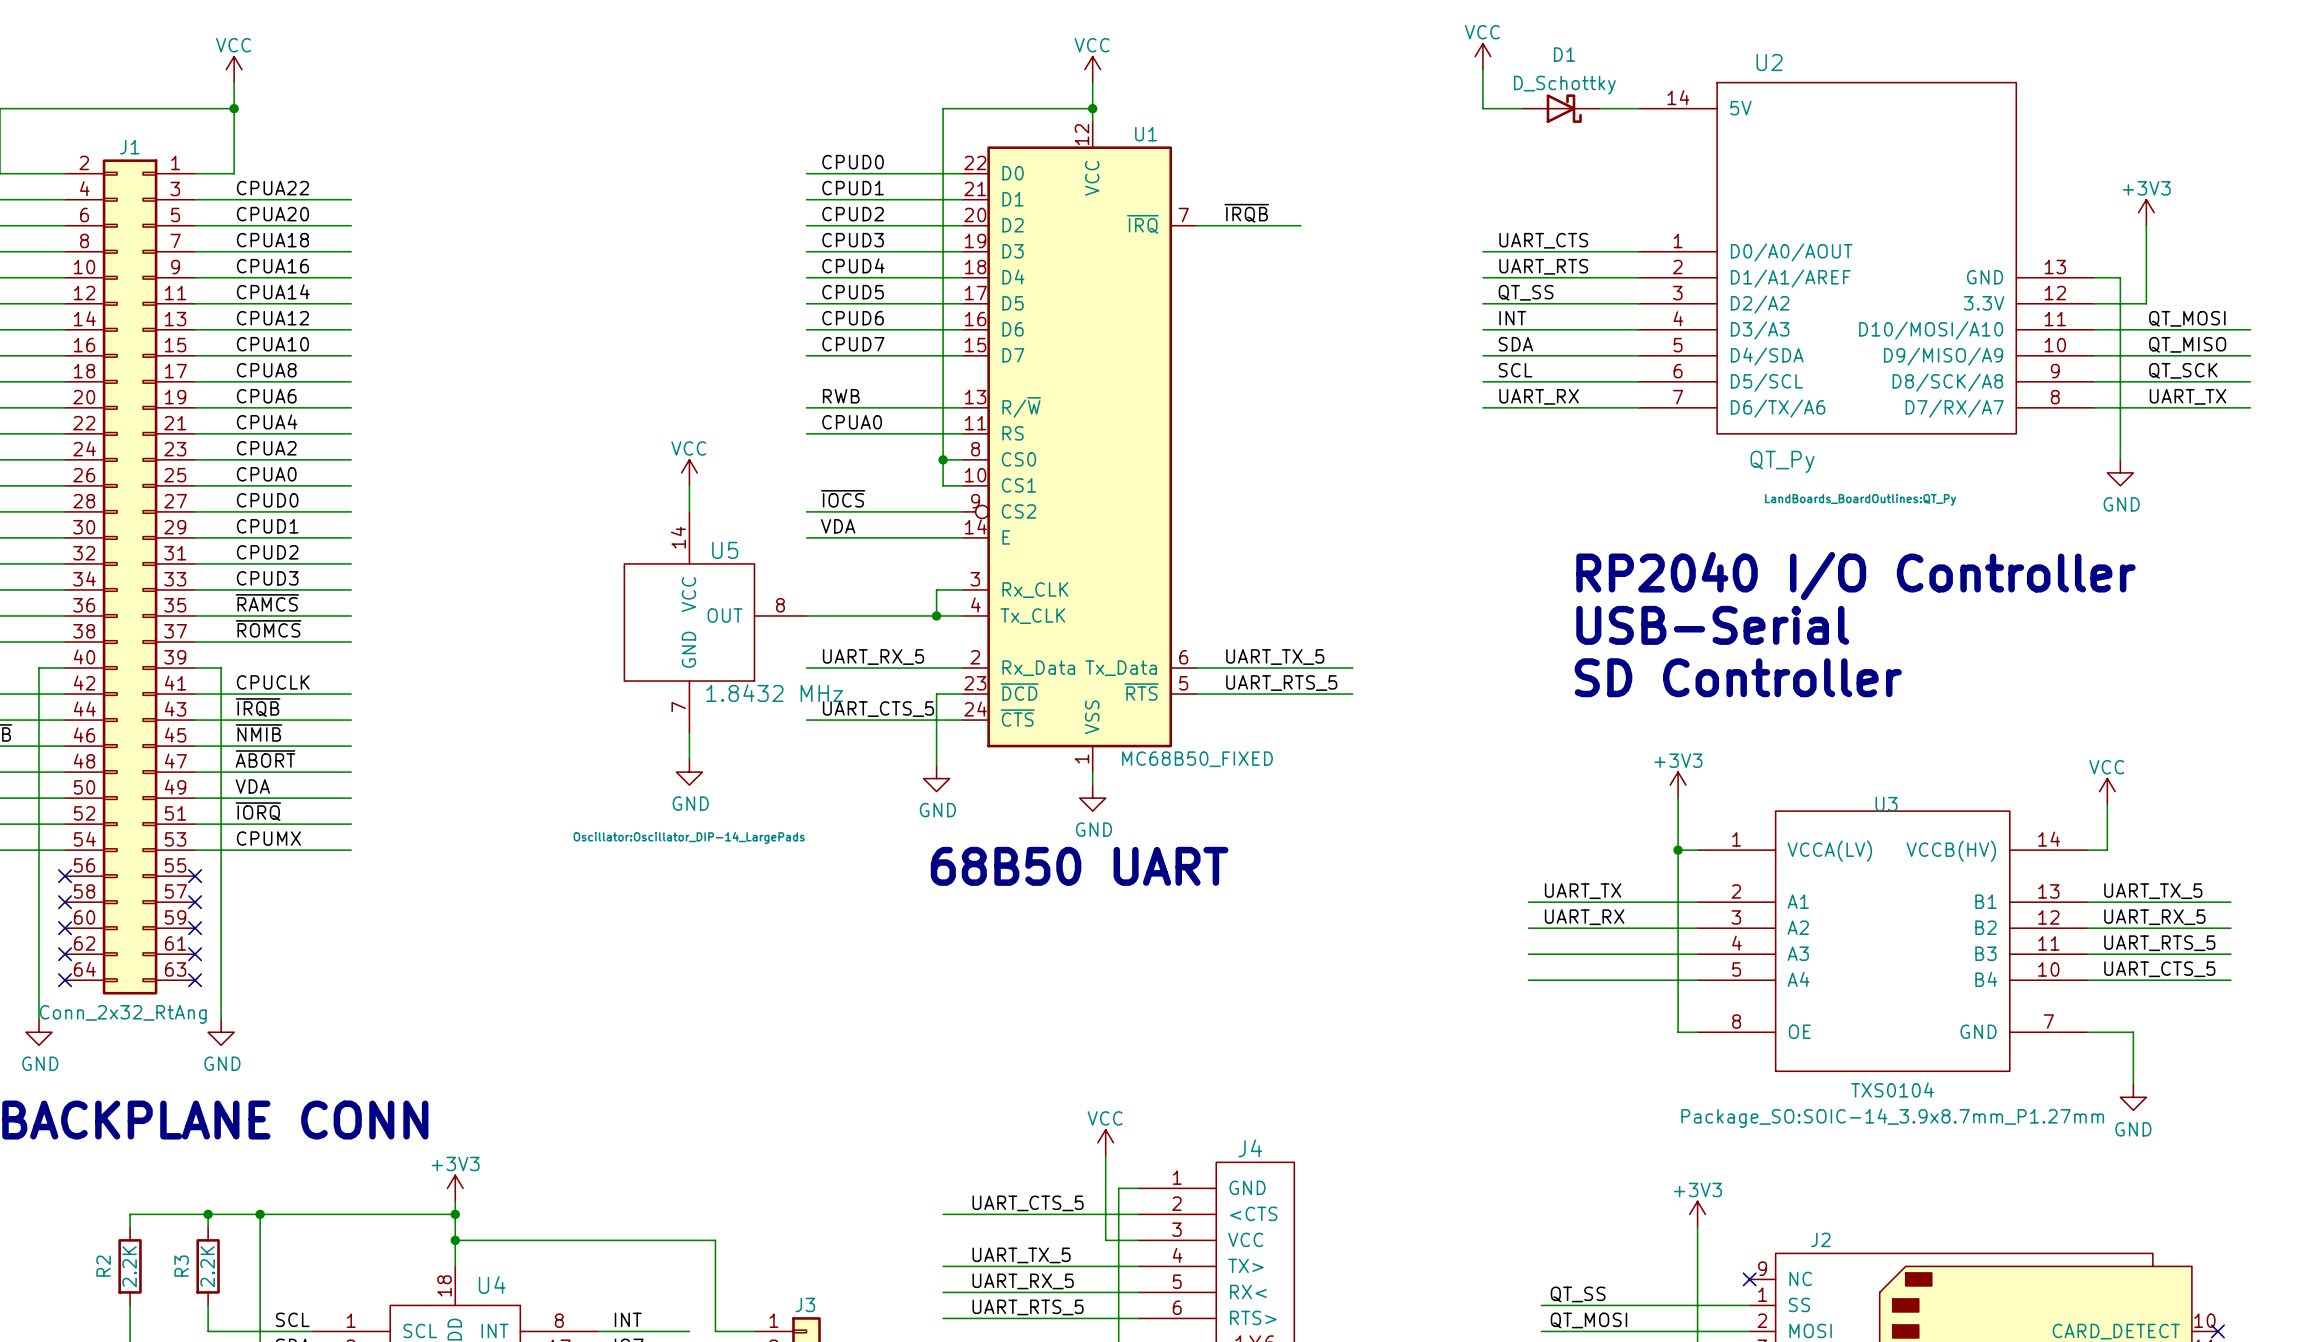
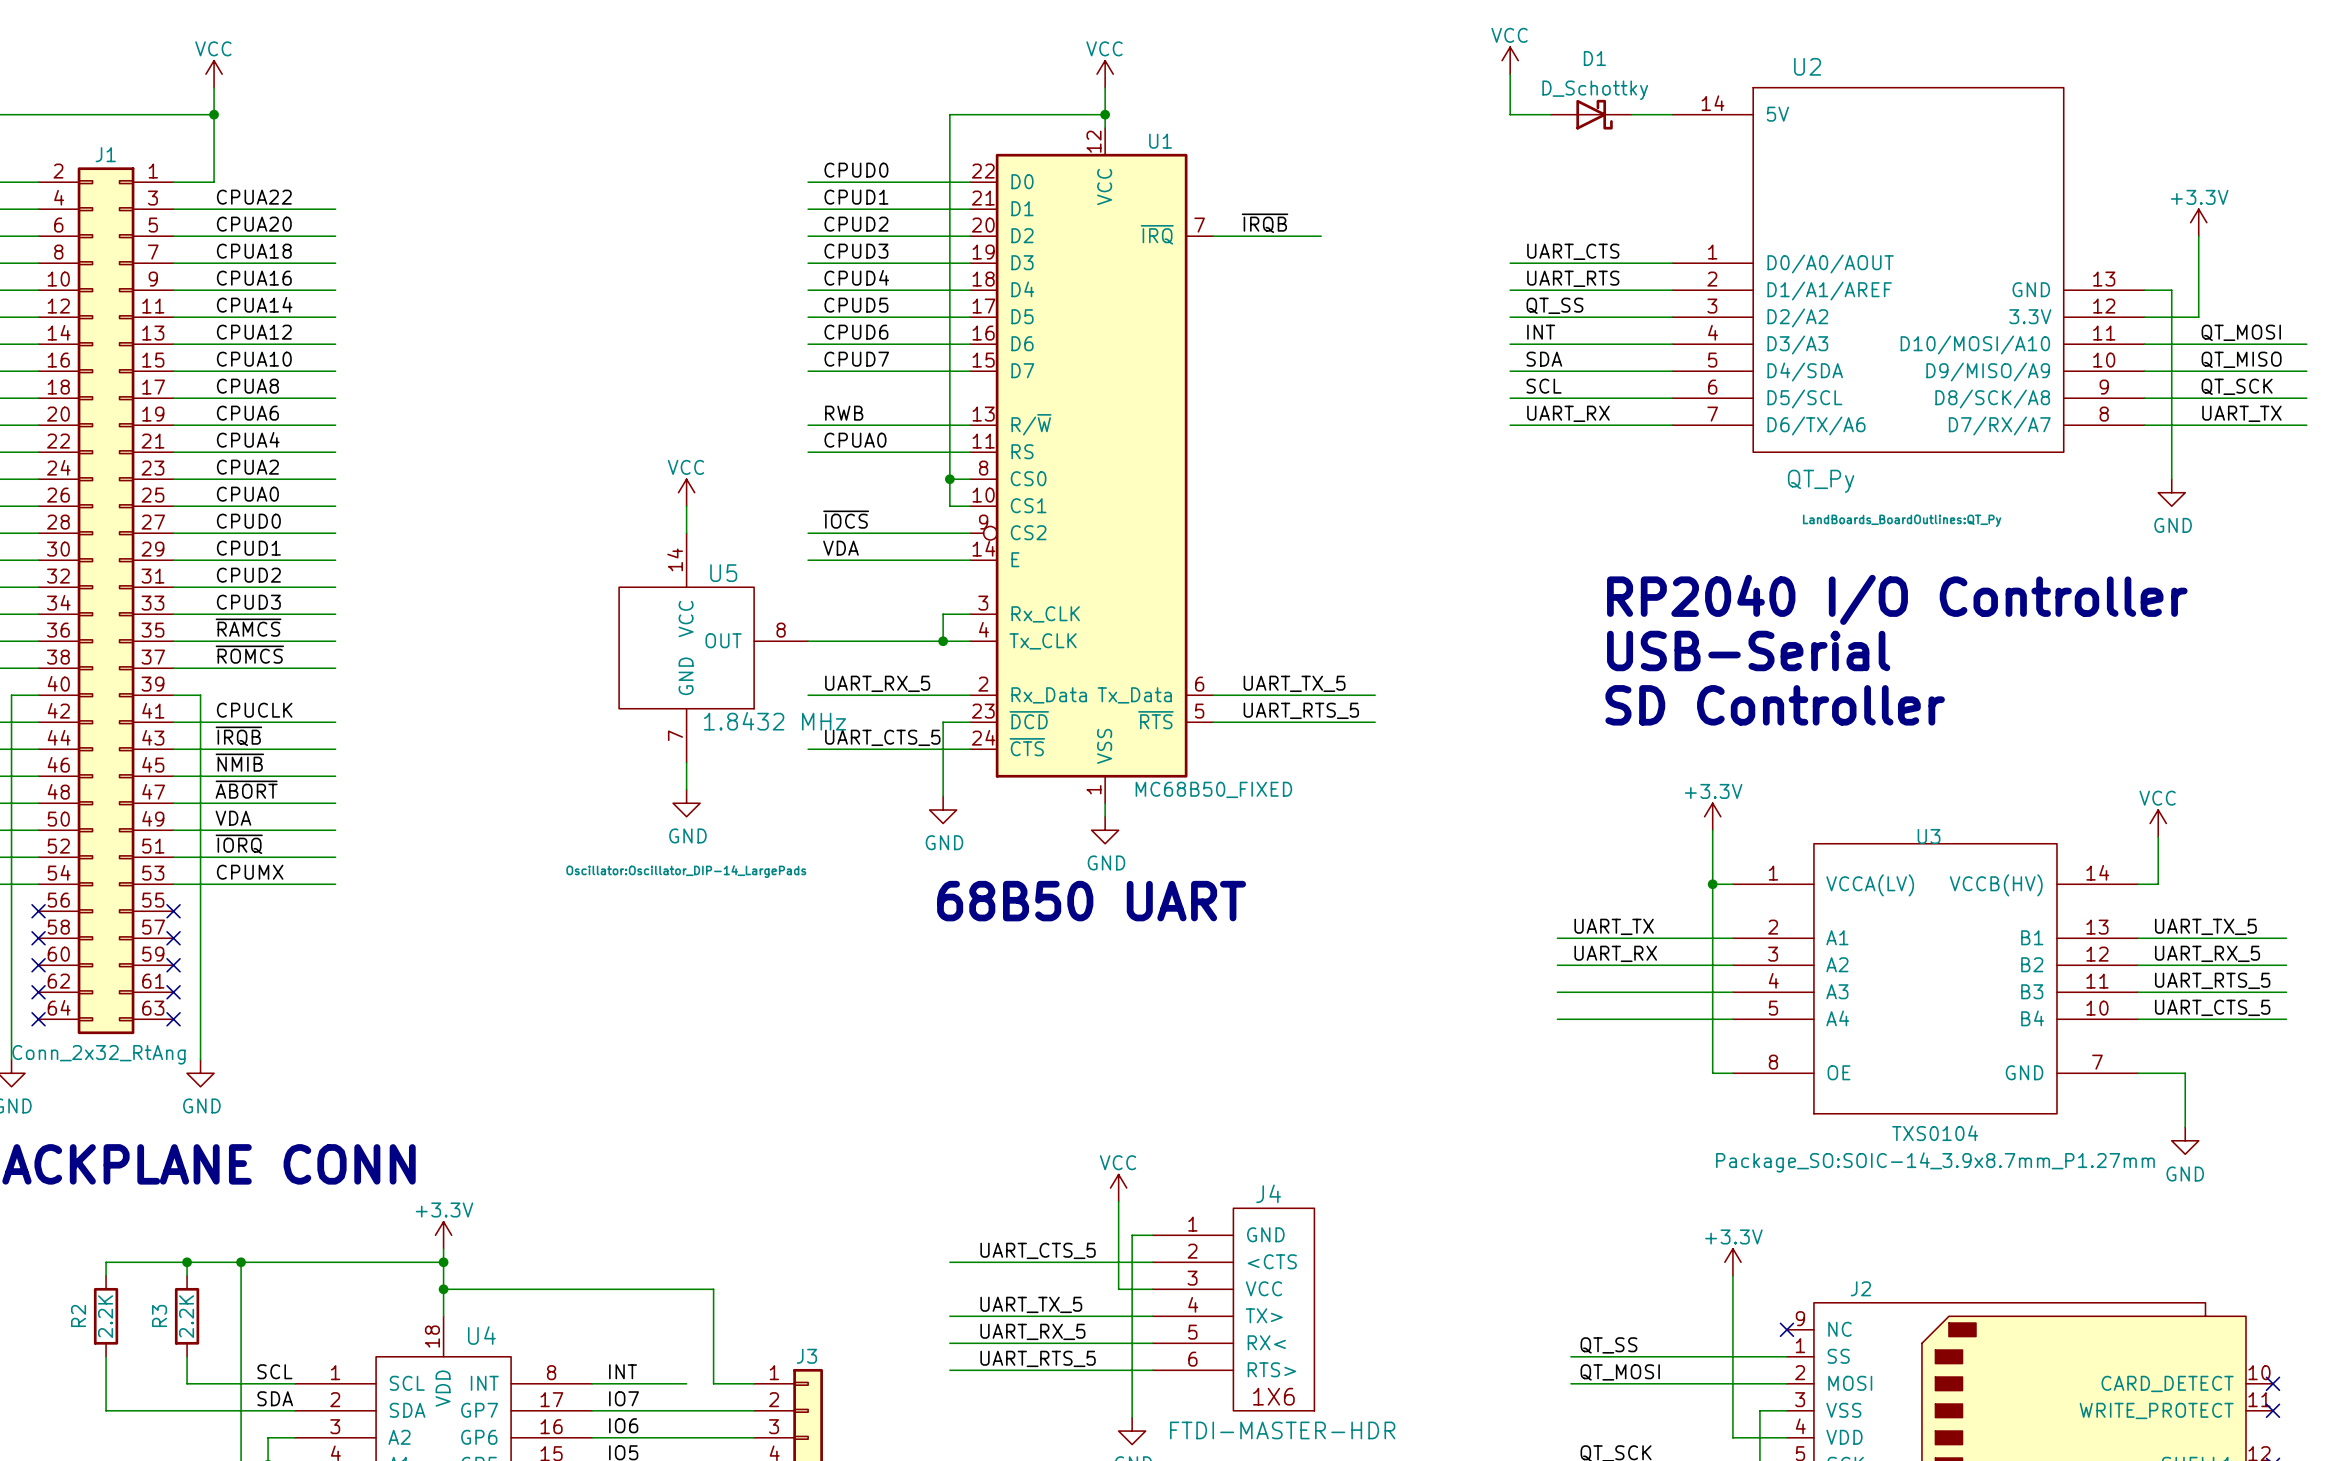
power symbol: +3V3 (2146, 212) -> +3.3V (2198, 222)
power symbol: +3V3 (1678, 785) -> +3.3V (1712, 816)
power symbol: +3V3 (455, 1188) -> +3.3V (443, 1235)
power symbol: +3V3 (1697, 1214) -> +3.3V (1732, 1262)

